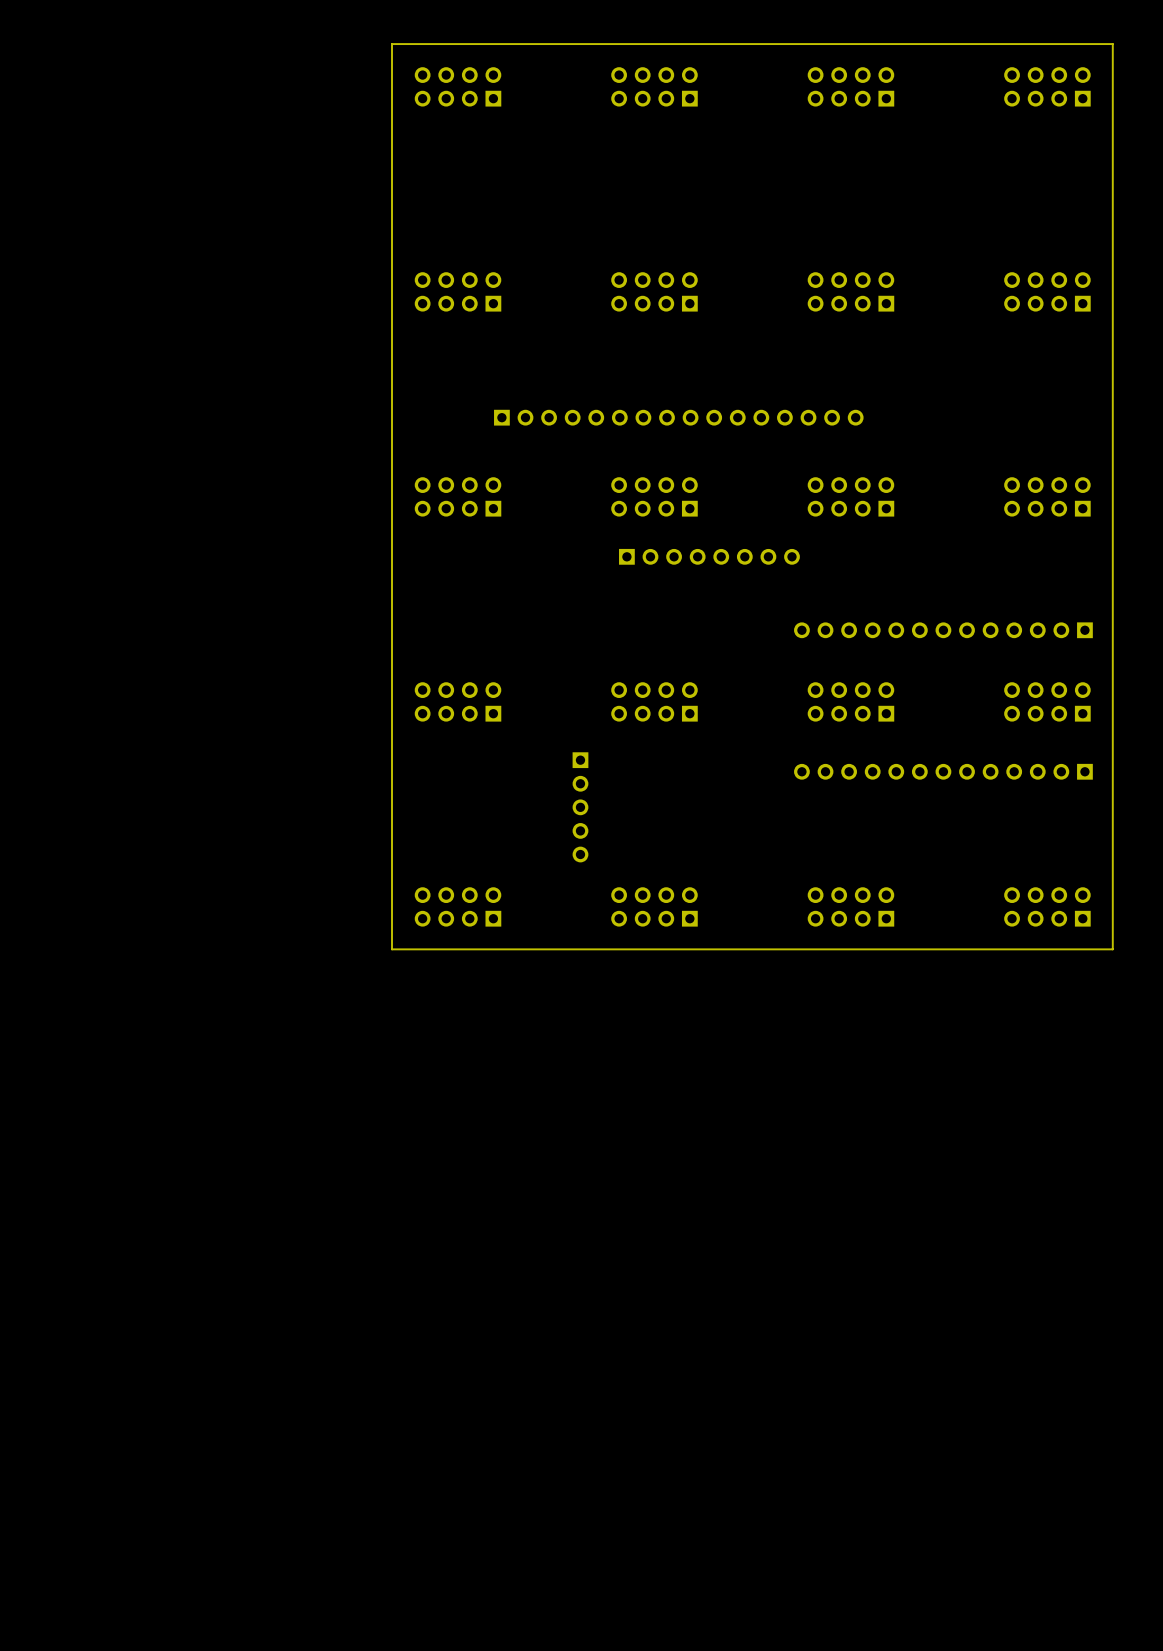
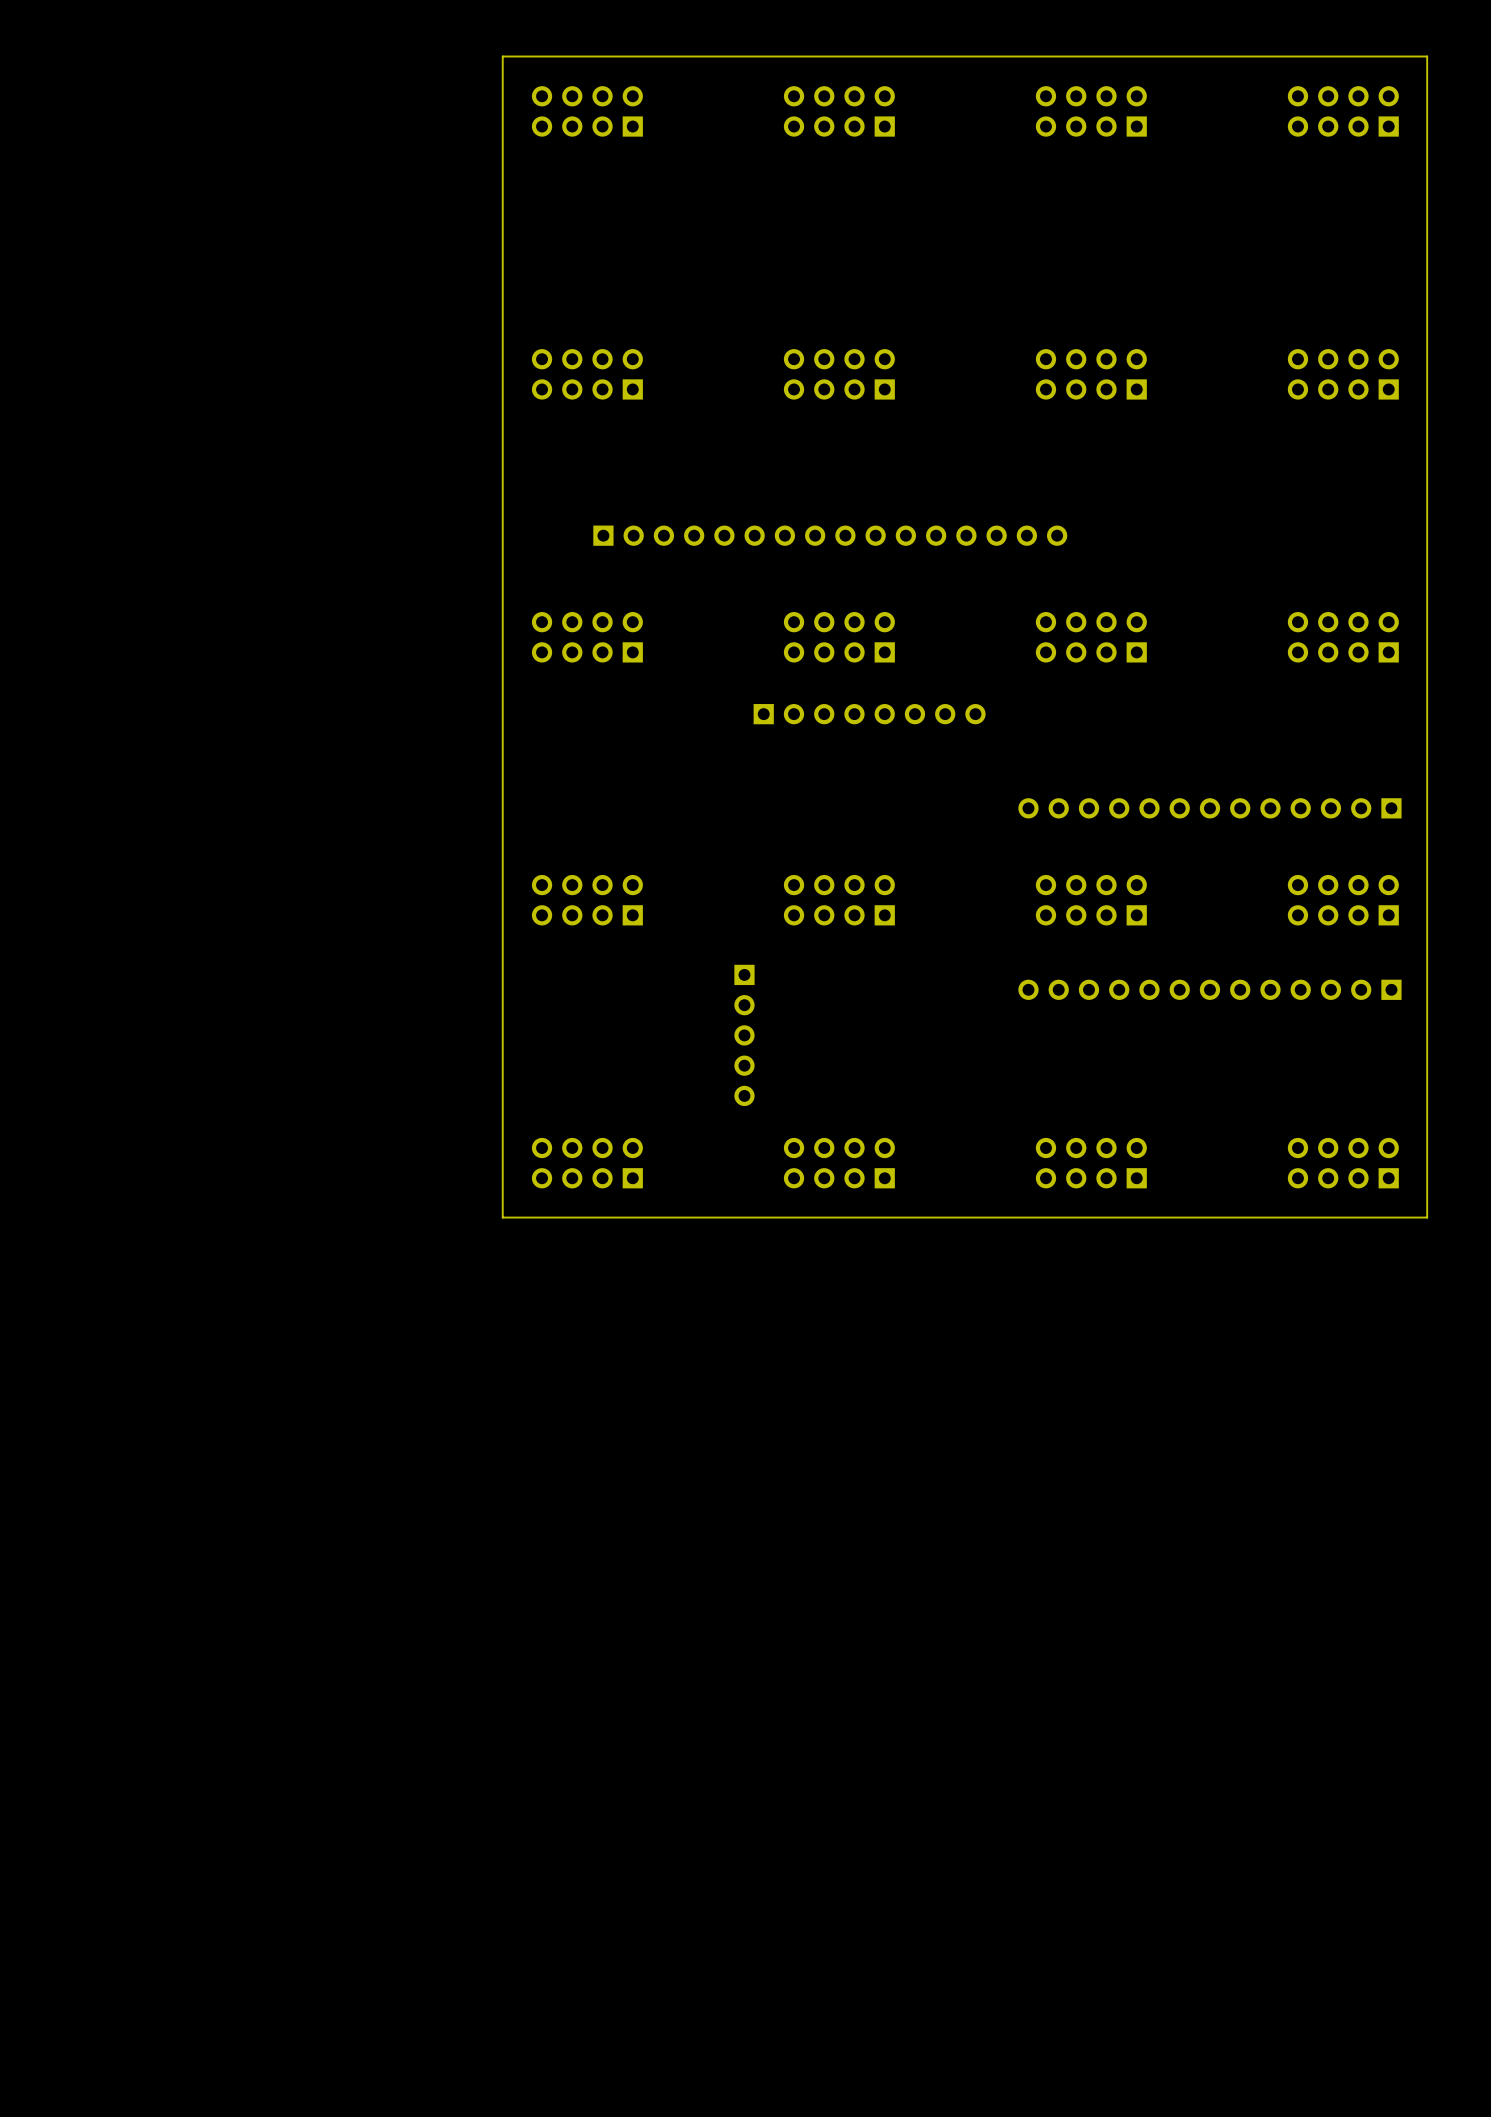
part position: (678, 417) -> (830, 535)
part position: (709, 556) -> (869, 714)

